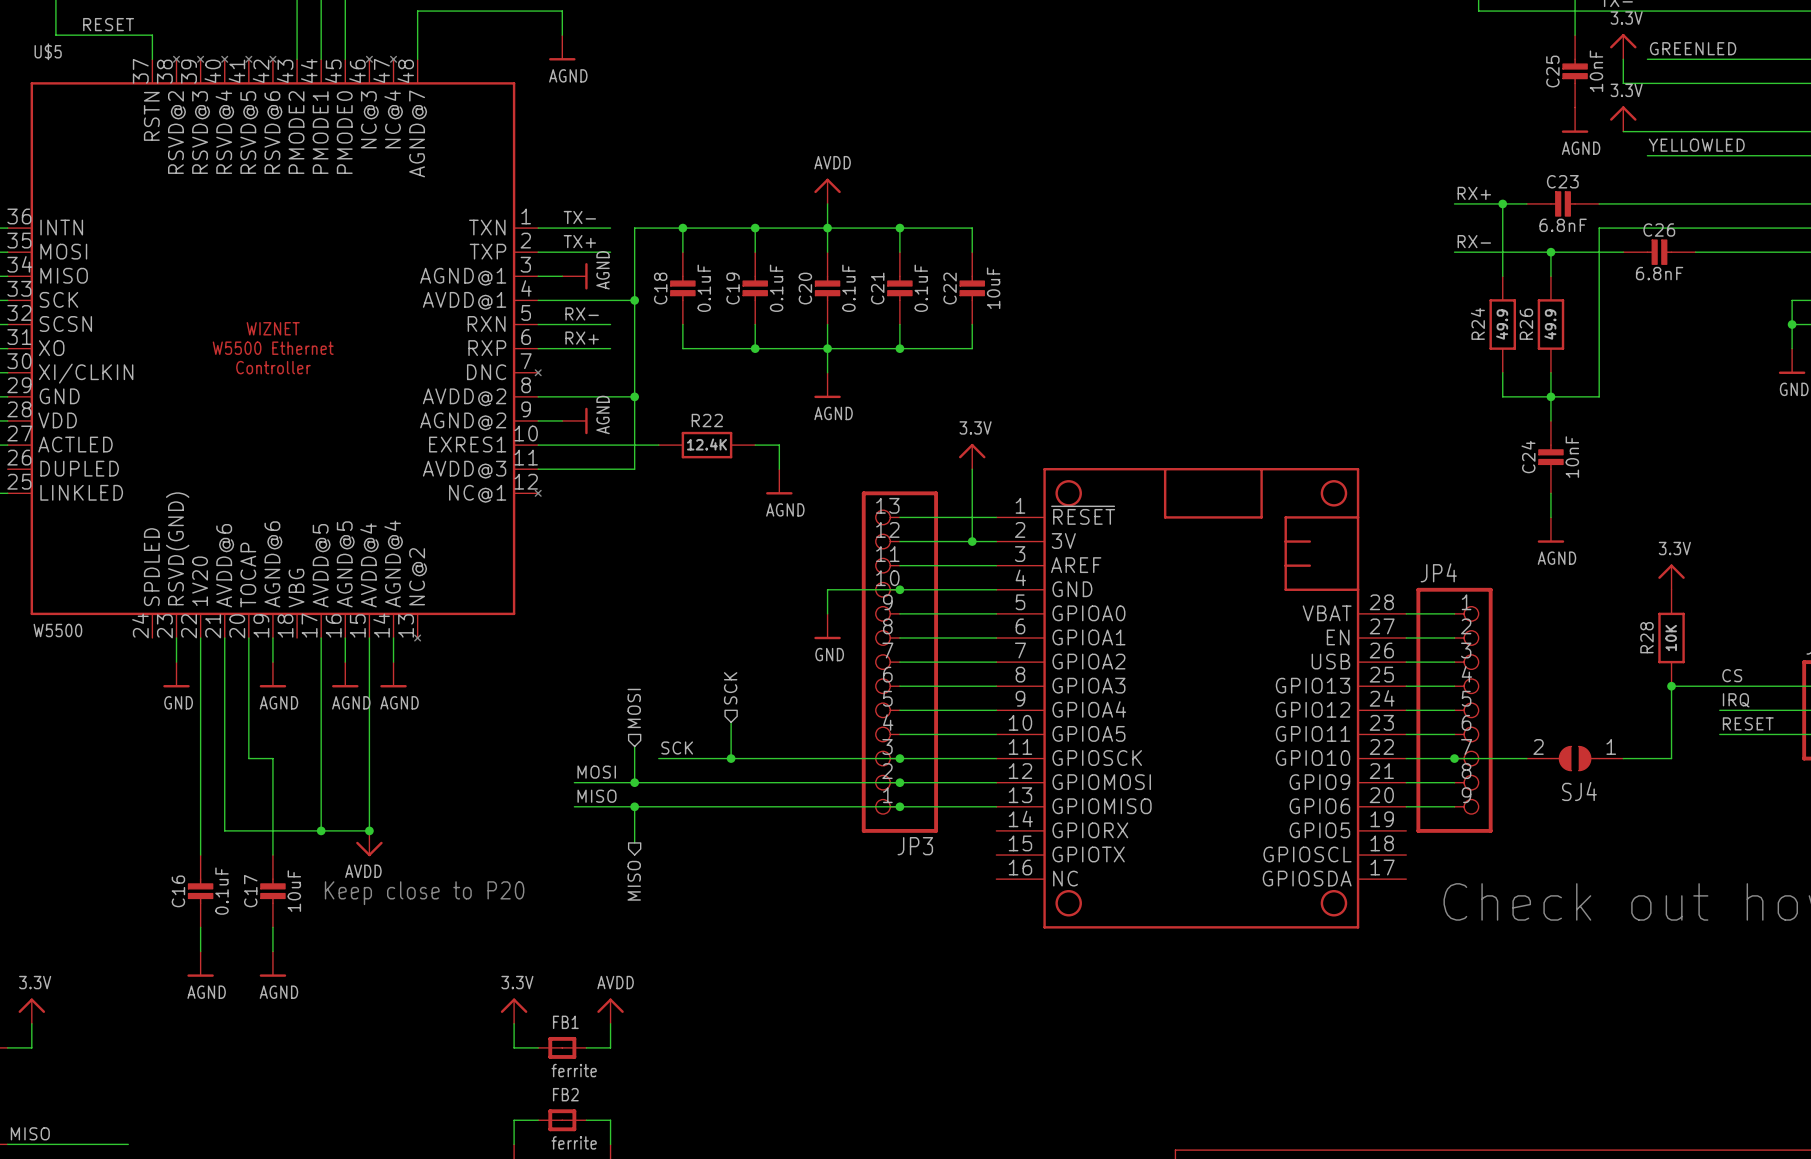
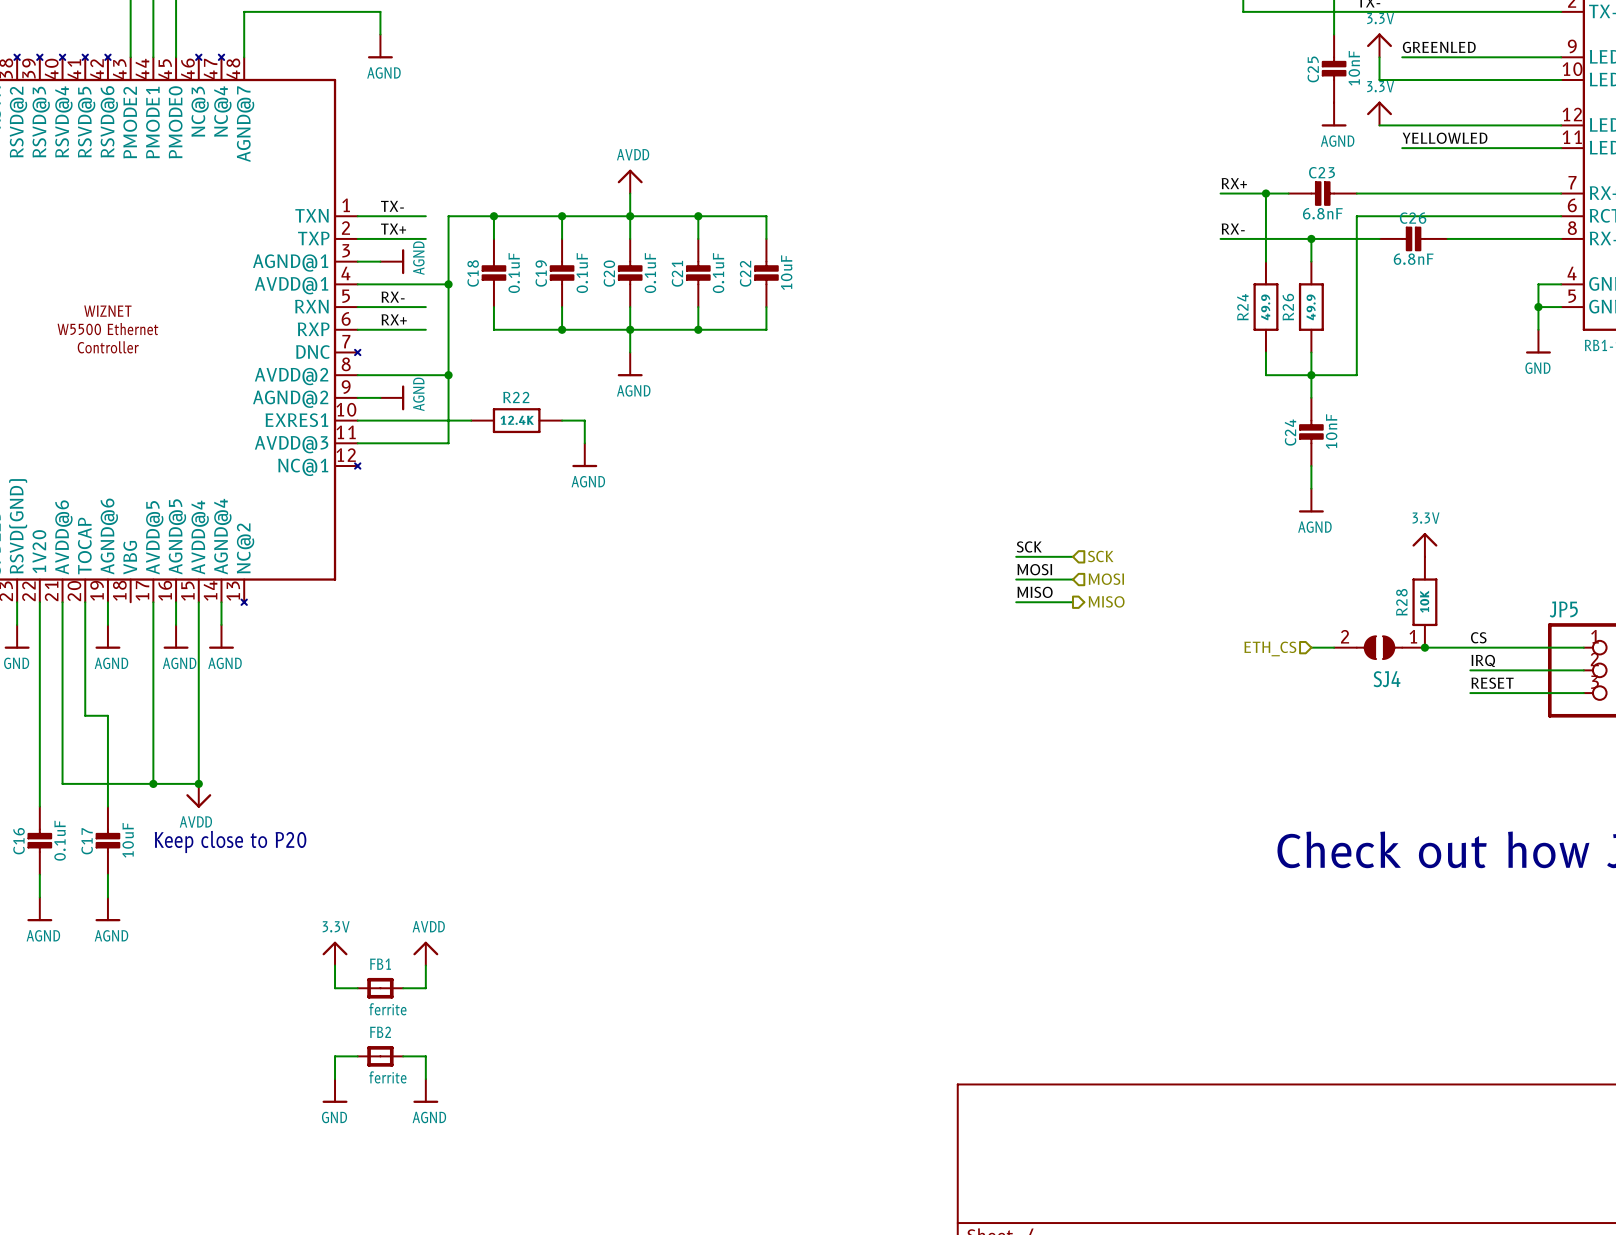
power symbol: 3.3V (972, 456) -> none
wire: (972, 469) (972, 541) -> none
wire: (899, 517) (996, 517) -> none
wire: (899, 541) (996, 541) -> none
junction: (972, 541) -> none
wire: (899, 565) (996, 565) -> none
label: none -> SCK (1029, 546)
junction: (899, 589) -> none
wire: (996, 589) (827, 589) (827, 613) -> none
wire: none -> (1016, 556) (1072, 556)
hierarchical label: none -> SCK (1100, 556)
label: none -> MOSI (1034, 569)
wire: (899, 613) (996, 613) -> none
wire: none -> (1016, 579) (1072, 579)
hierarchical label: none -> MOSI (1106, 579)
wire: (1406, 613) (1454, 613) -> none
power symbol: GND (827, 626) -> none
label: none -> MISO (1035, 592)
hierarchical label: none -> MISO (1106, 601)
wire: (899, 638) (996, 638) -> none
wire: none -> (1016, 602) (1072, 602)
wire: (1406, 638) (1454, 638) -> none
wire: (899, 662) (996, 662) -> none
JP3: (899, 662) -> none
wire: (1406, 662) (1454, 662) -> none
wire: (899, 686) (996, 686) -> none
wire: (1406, 686) (1454, 686) -> none
hierarchical label: none -> ETH_CS (1270, 648)
wire: none -> (1311, 647) (1334, 647)
wire: (1671, 686) (1671, 758) (1623, 758) -> none
hierarchical label: SCK (730, 688) -> none
part: (1201, 698) -> none
hierarchical label: MOSI (634, 708) -> none
wire: (899, 710) (996, 710) -> none
wire: (1406, 710) (1454, 710) -> none
JP4: (1454, 710) -> none
wire: (731, 722) (731, 758) -> none
wire: (899, 734) (996, 734) -> none
wire: (1406, 734) (1454, 734) -> none
wire: (634, 746) (634, 782) -> none
label: SCK (677, 747) -> none
wire: (658, 758) (996, 758) -> none
junction: (731, 758) -> none
junction: (899, 758) -> none
wire: (1406, 758) (1526, 758) -> none
junction: (1454, 758) -> none
SJ4 position: (1575, 758) -> (1379, 647)
label: MOSI (596, 772) -> none
wire: (574, 782) (996, 782) -> none
junction: (634, 782) -> none
junction: (899, 782) -> none
wire: (1406, 782) (1454, 782) -> none
label: MISO (596, 796) -> none
wire: (574, 806) (996, 806) -> none
wire: (634, 806) (634, 842) -> none
junction: (634, 806) -> none
junction: (899, 806) -> none
wire: (1406, 806) (1454, 806) -> none
hierarchical label: MISO (634, 880) -> none

